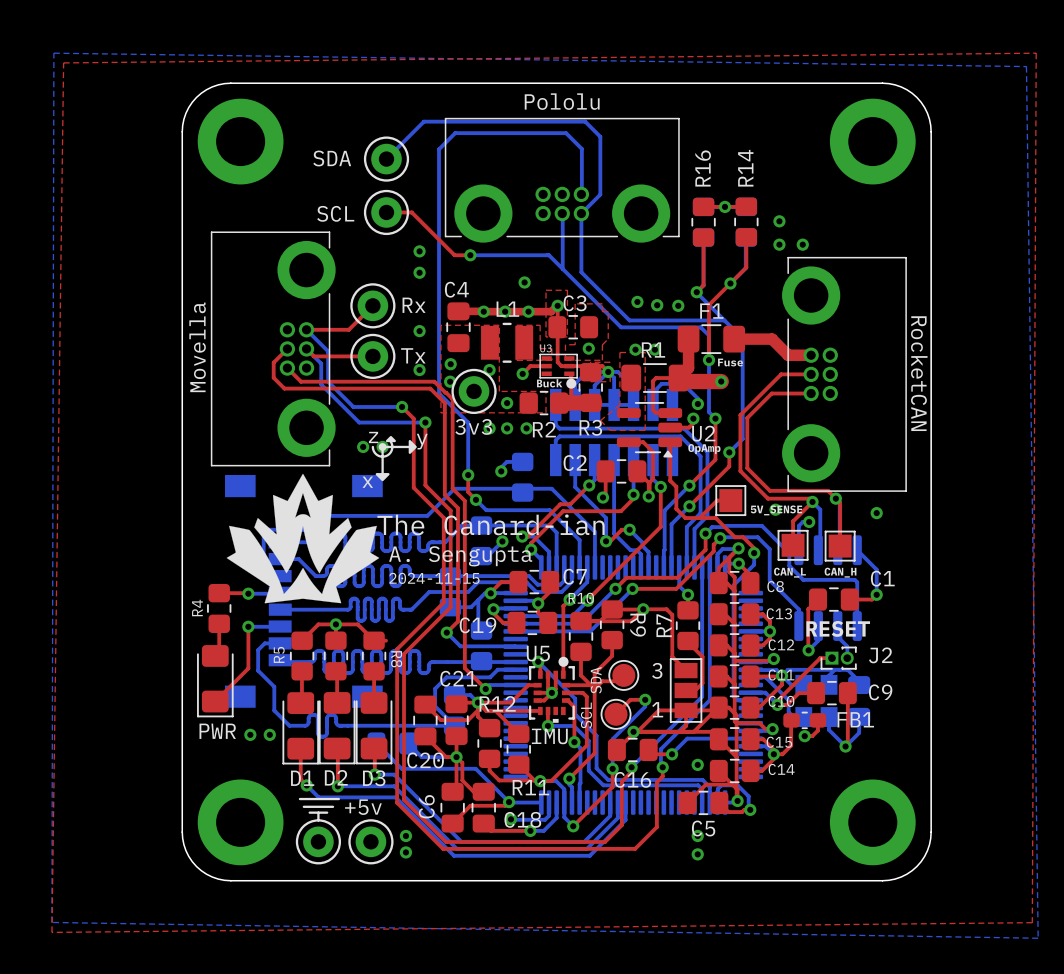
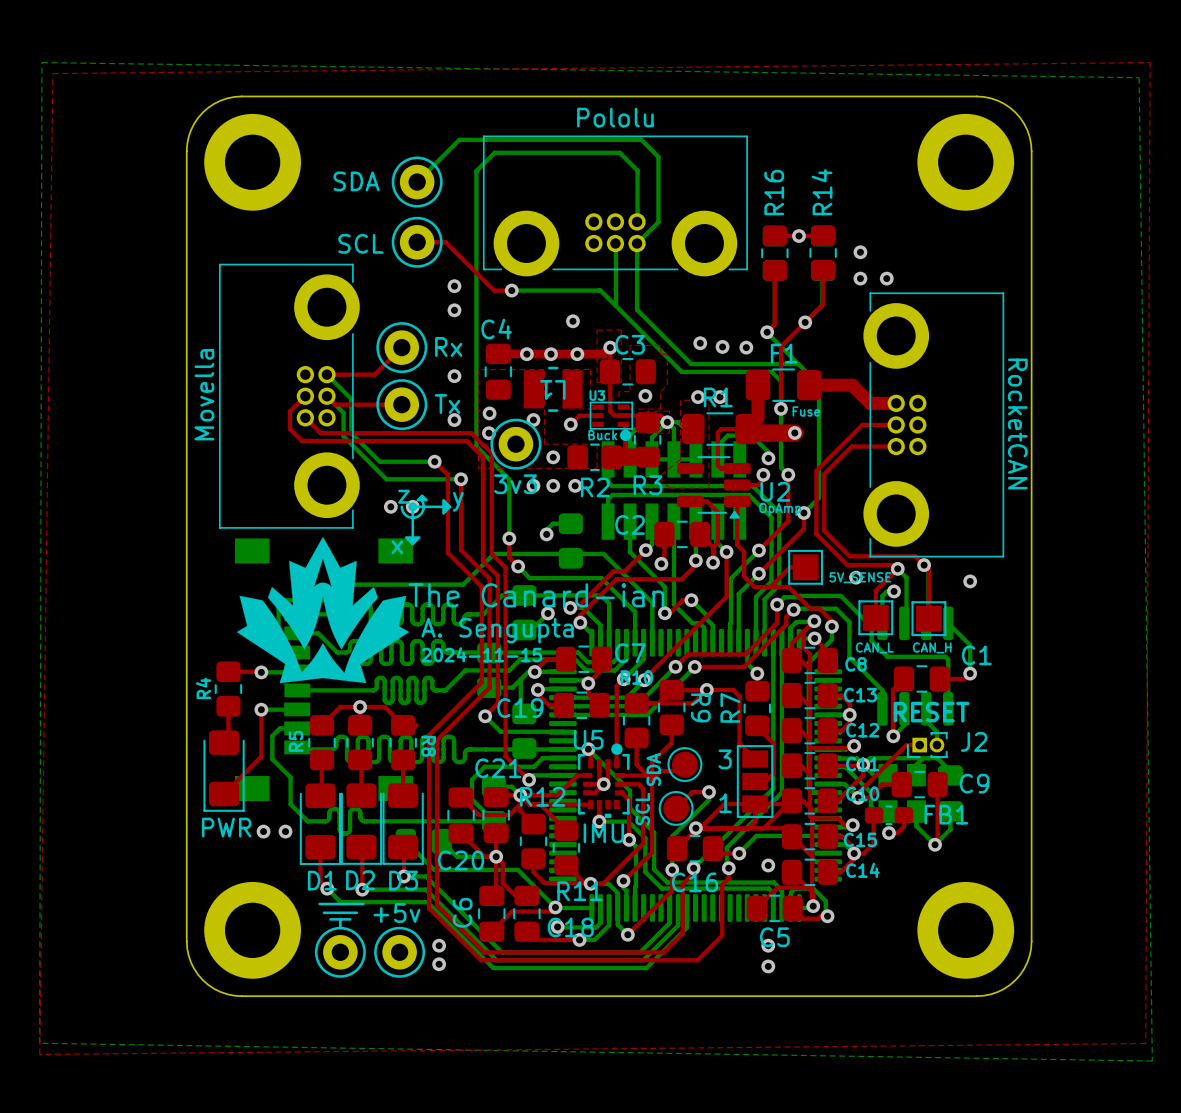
L1 name rotation: 0° (507, 309) -> 180° (552, 389)

